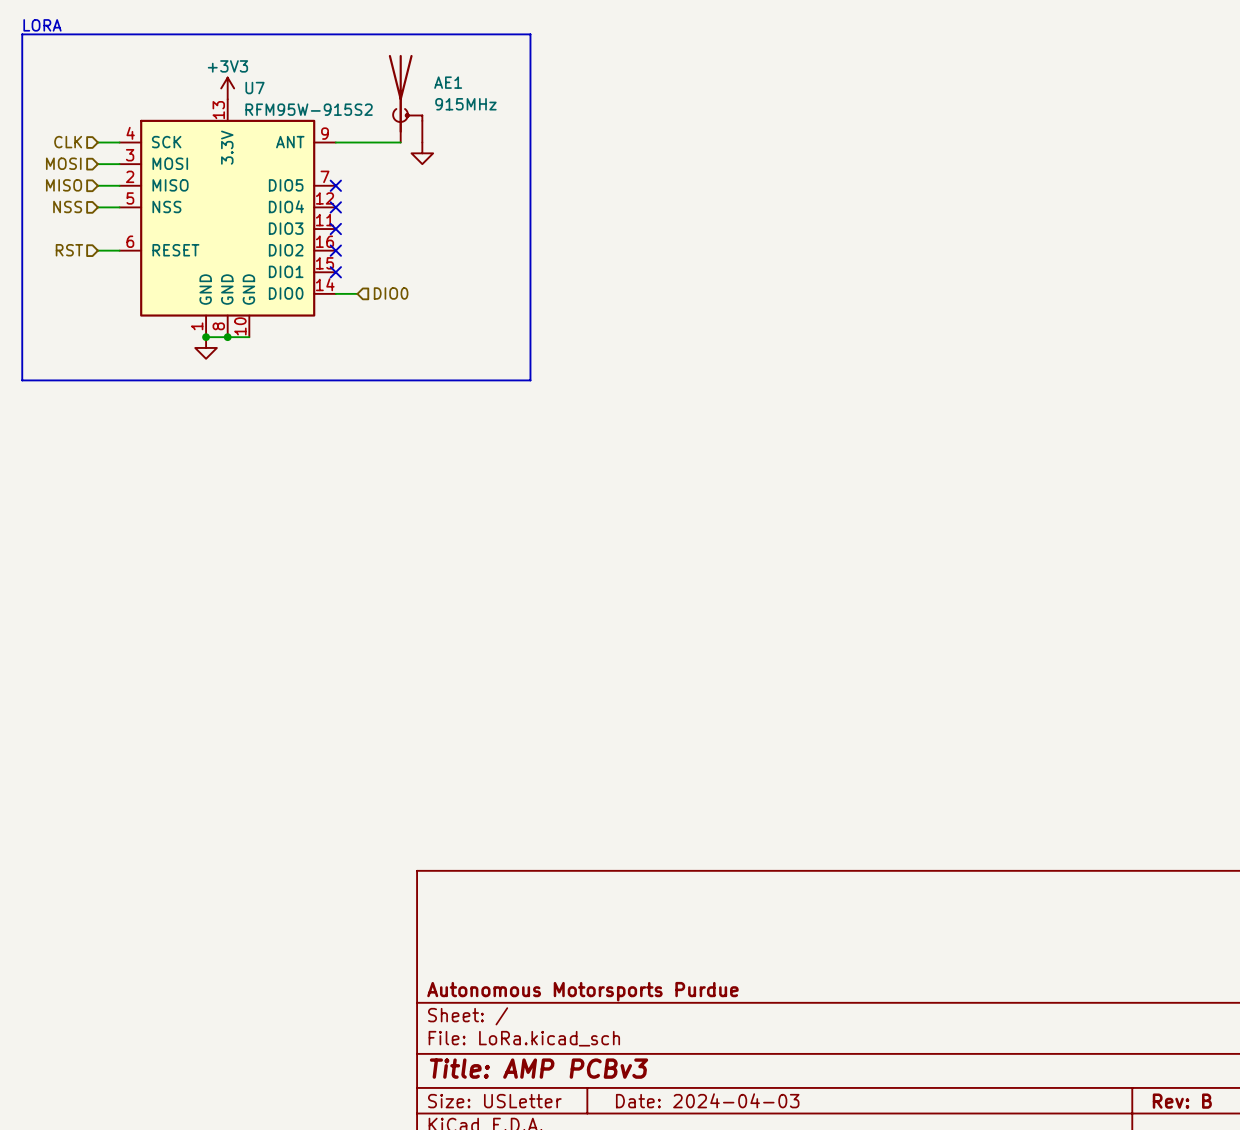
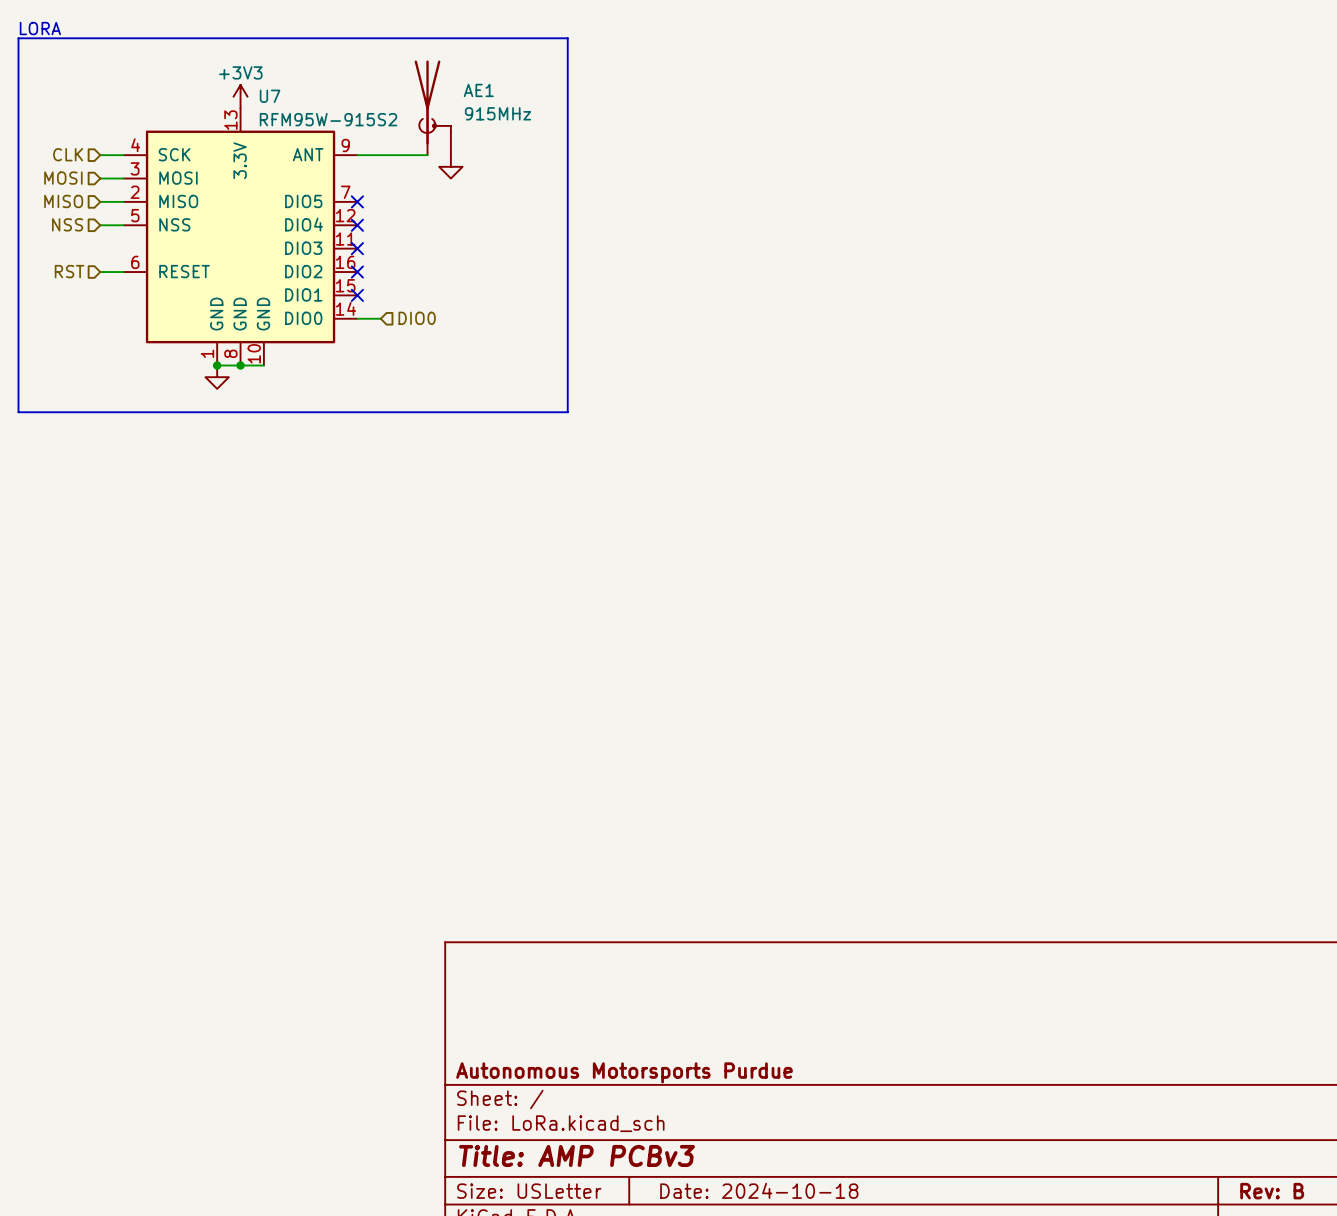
title block: Date: 2024-04-03 (707, 1100) -> Date: 2024-10-18 (759, 1190)

